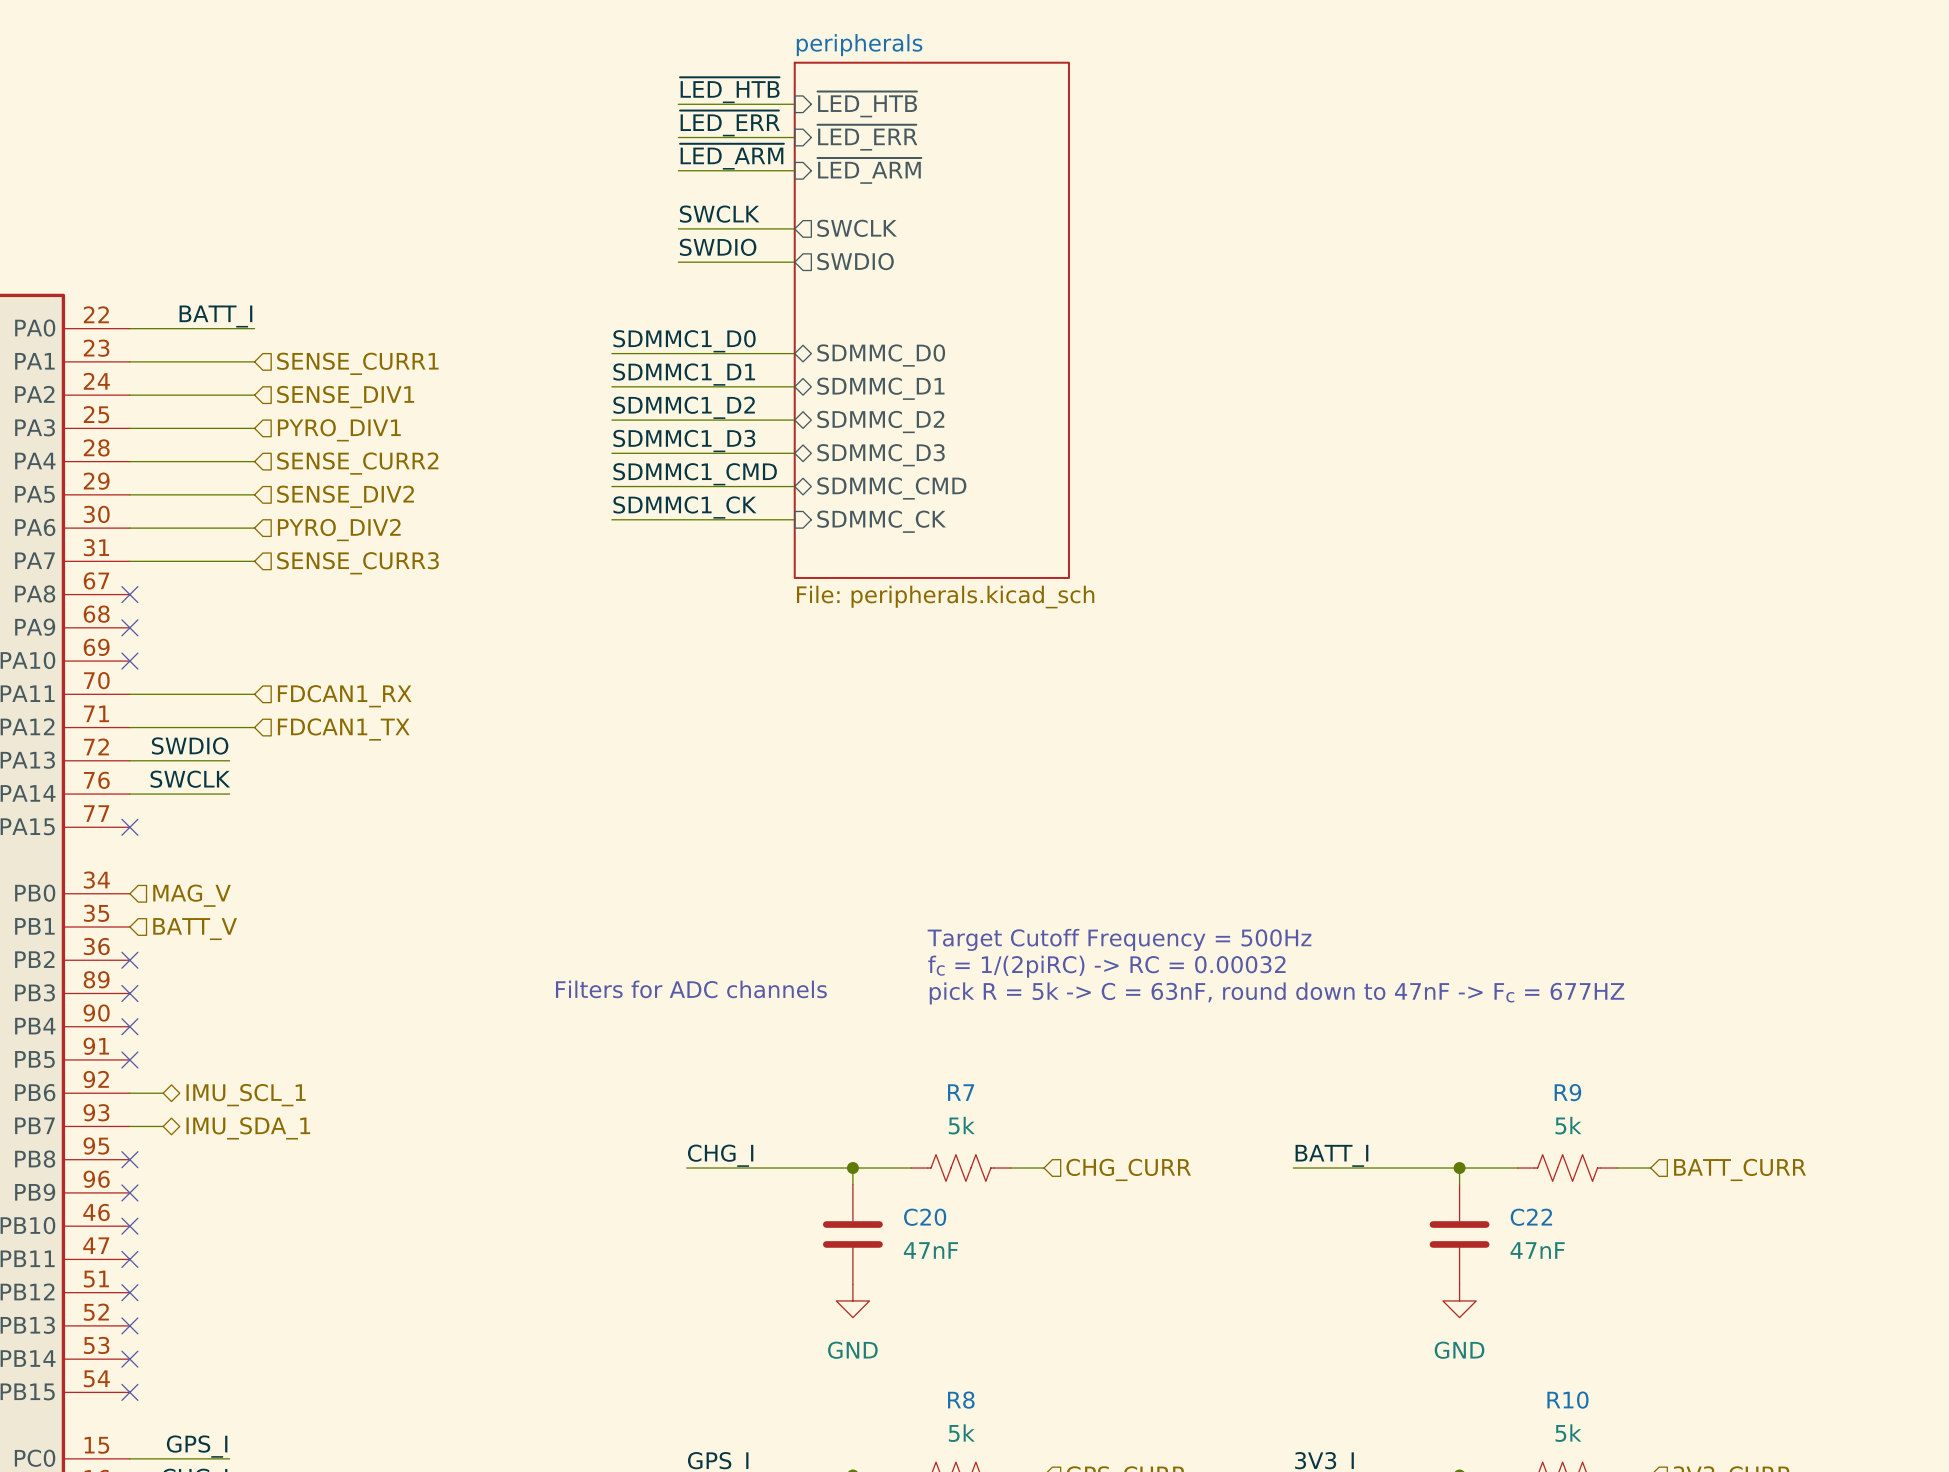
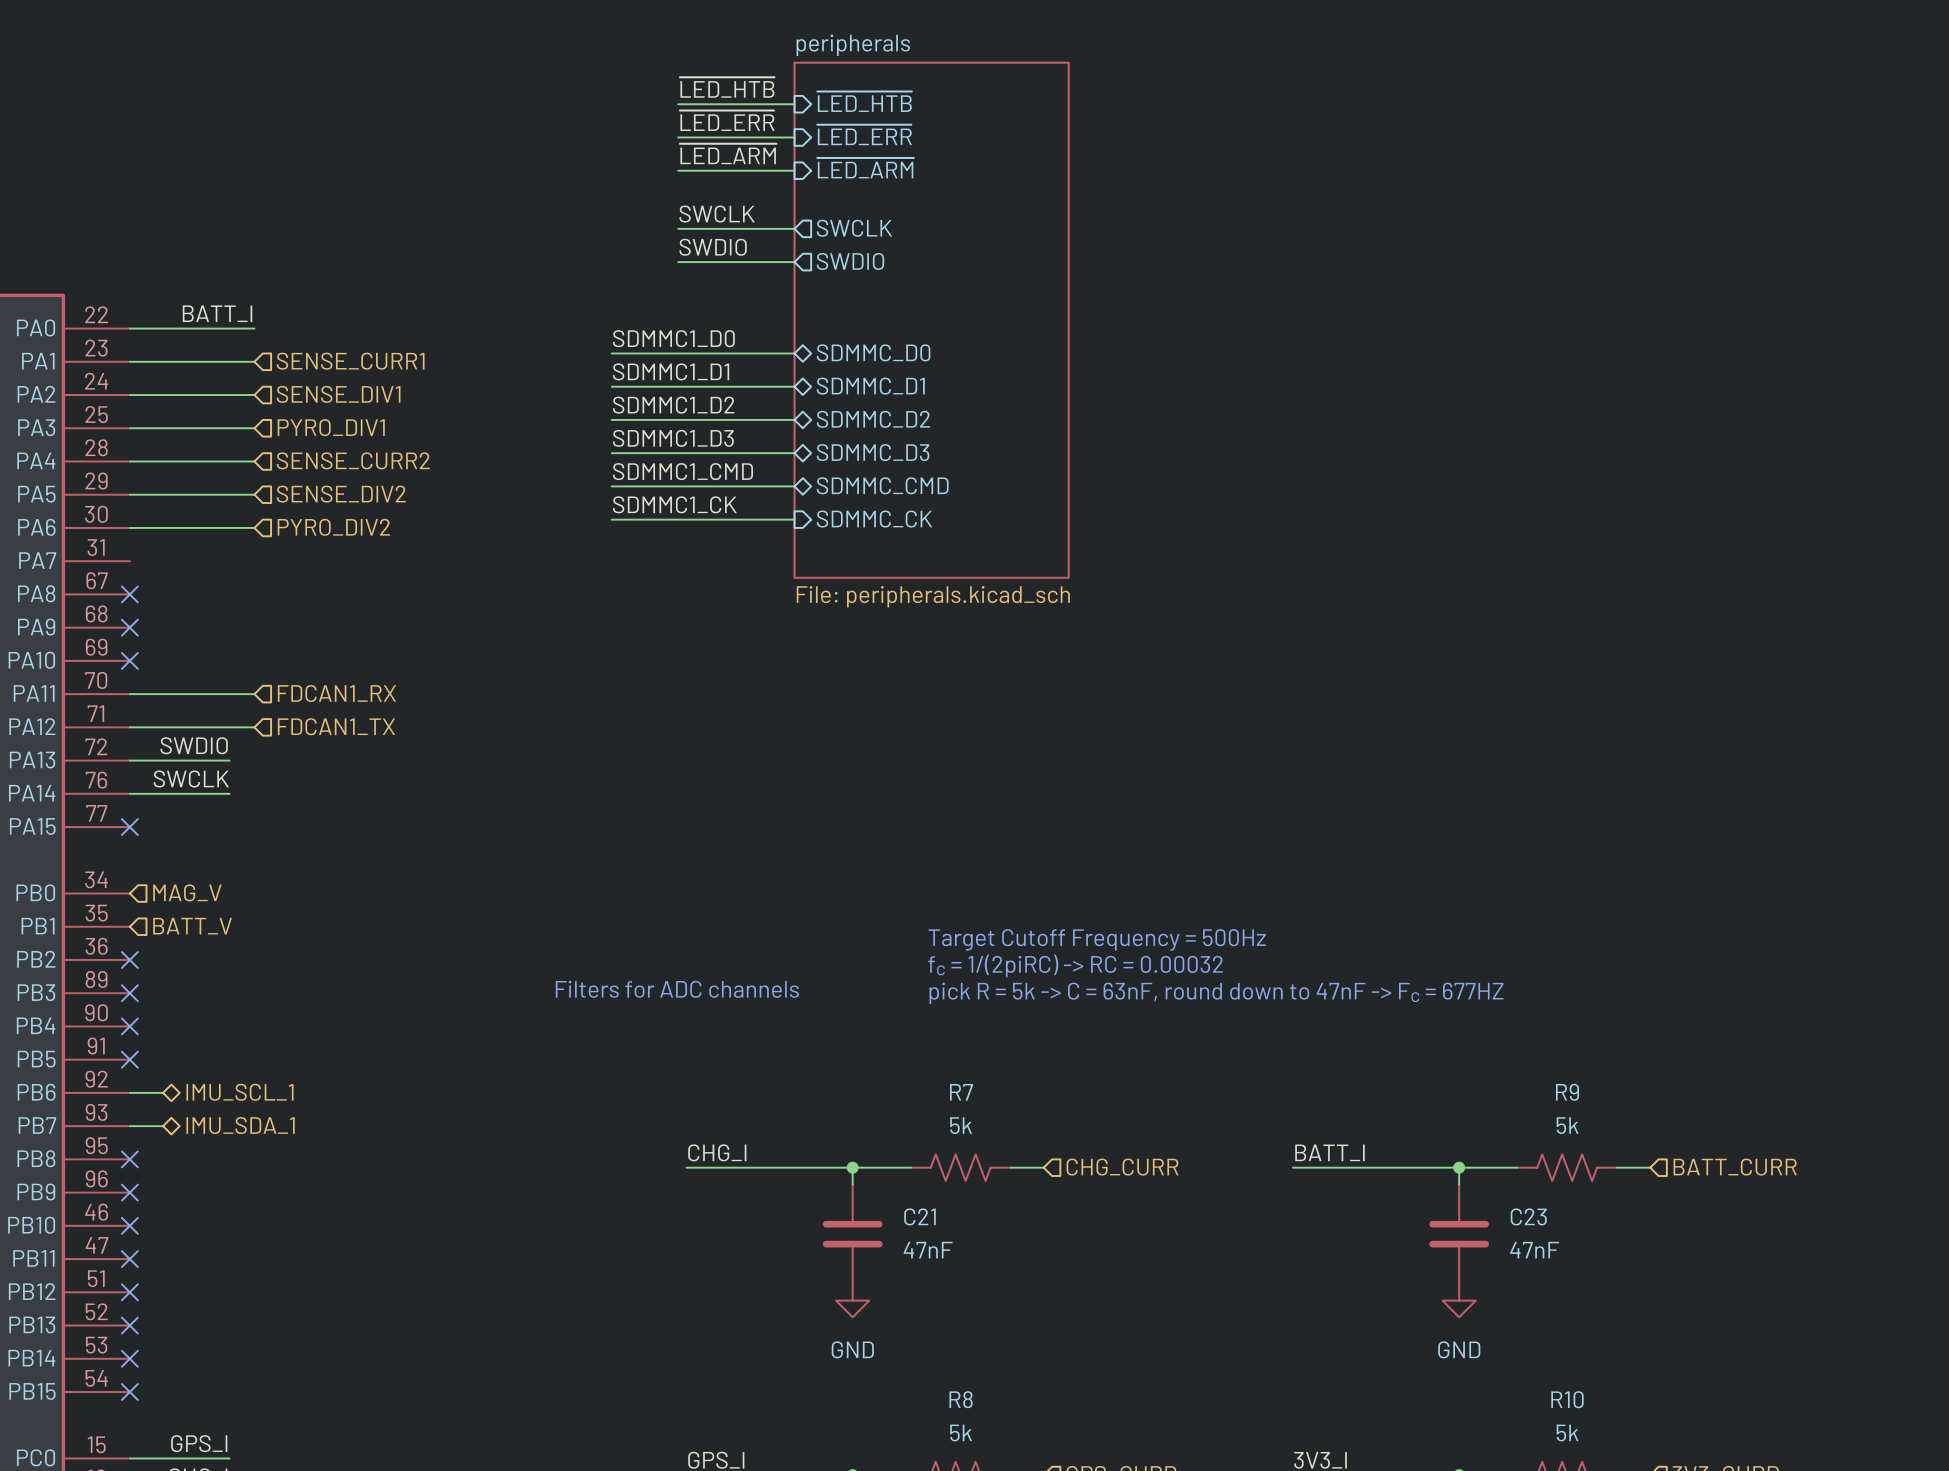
wire: (129, 561) (254, 561) -> none
hierarchical label: SENSE_CURR3 (358, 563) -> none
C20 name: C20 (925, 1217) -> C21 (919, 1216)
C22 name: C22 (1531, 1217) -> C23 (1528, 1216)

